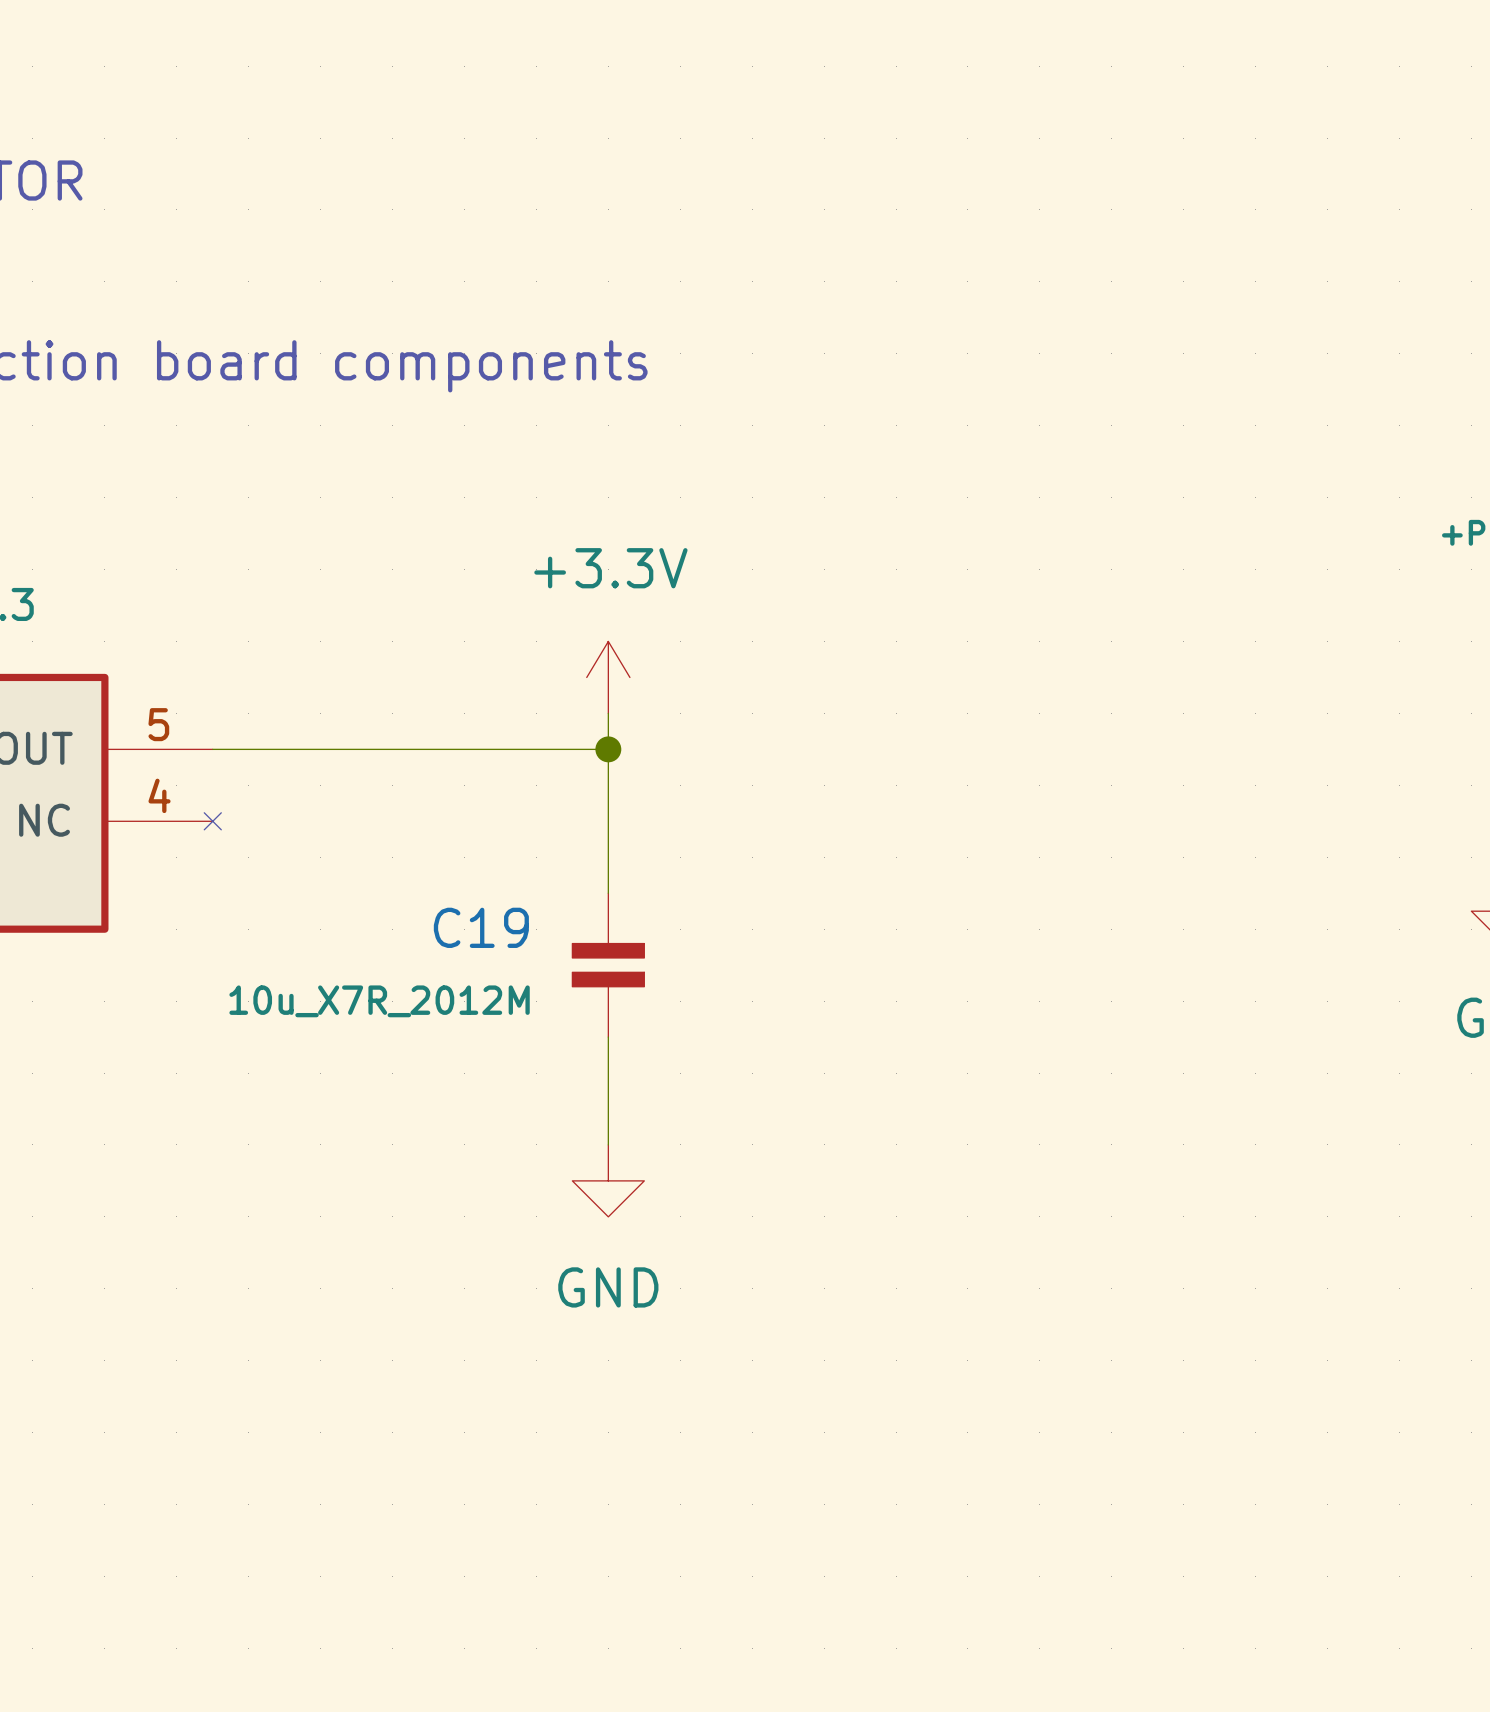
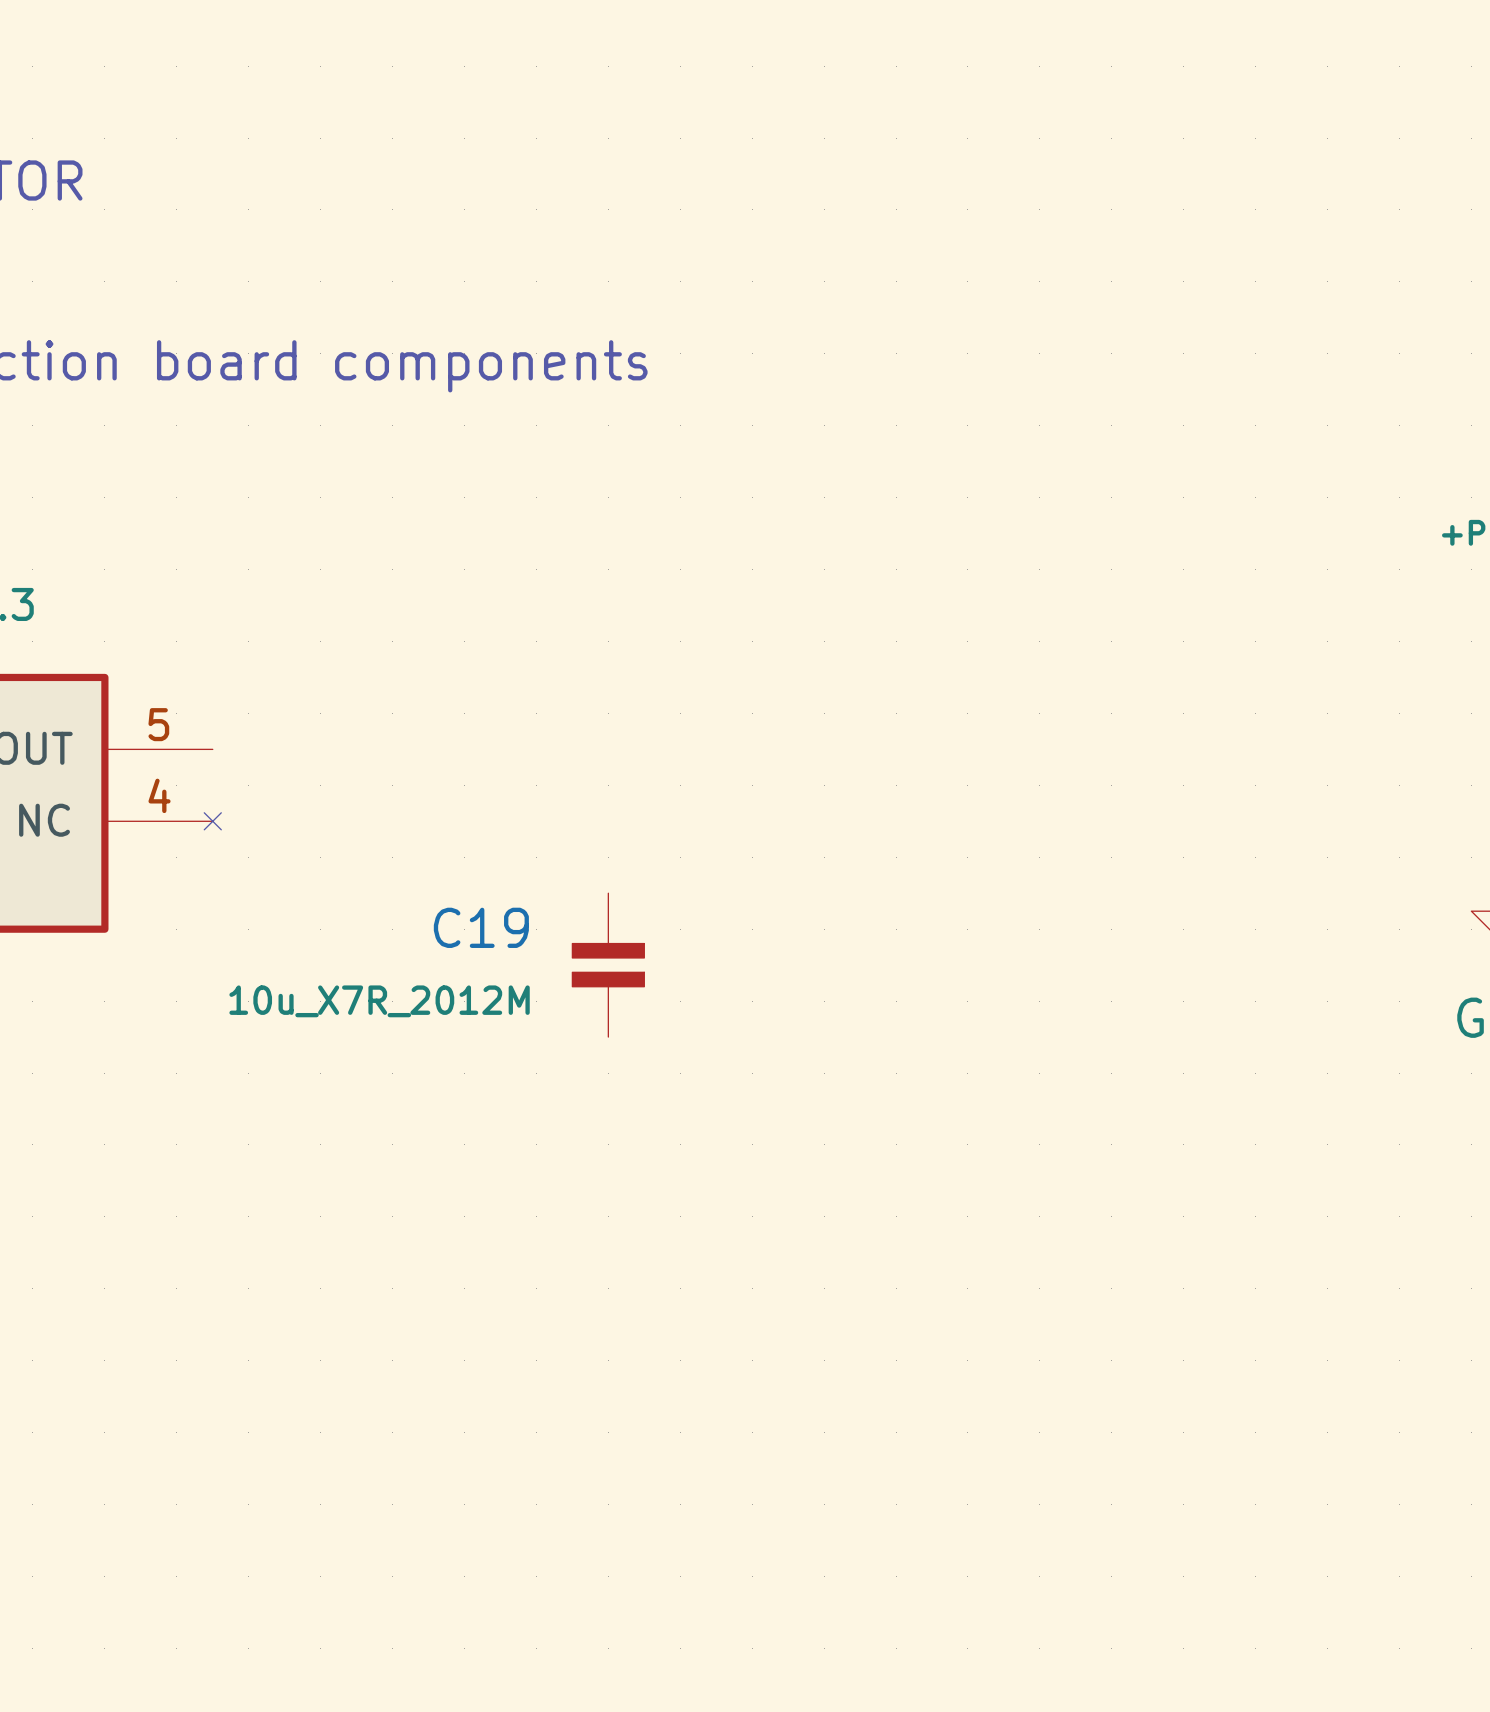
power symbol: +3.3V (608, 677) -> none
wire: (608, 713) (608, 893) -> none
wire: (212, 749) (608, 749) -> none
junction: (608, 749) -> none
wire: (608, 1037) (608, 1144) -> none
power symbol: GND (608, 1180) -> none

